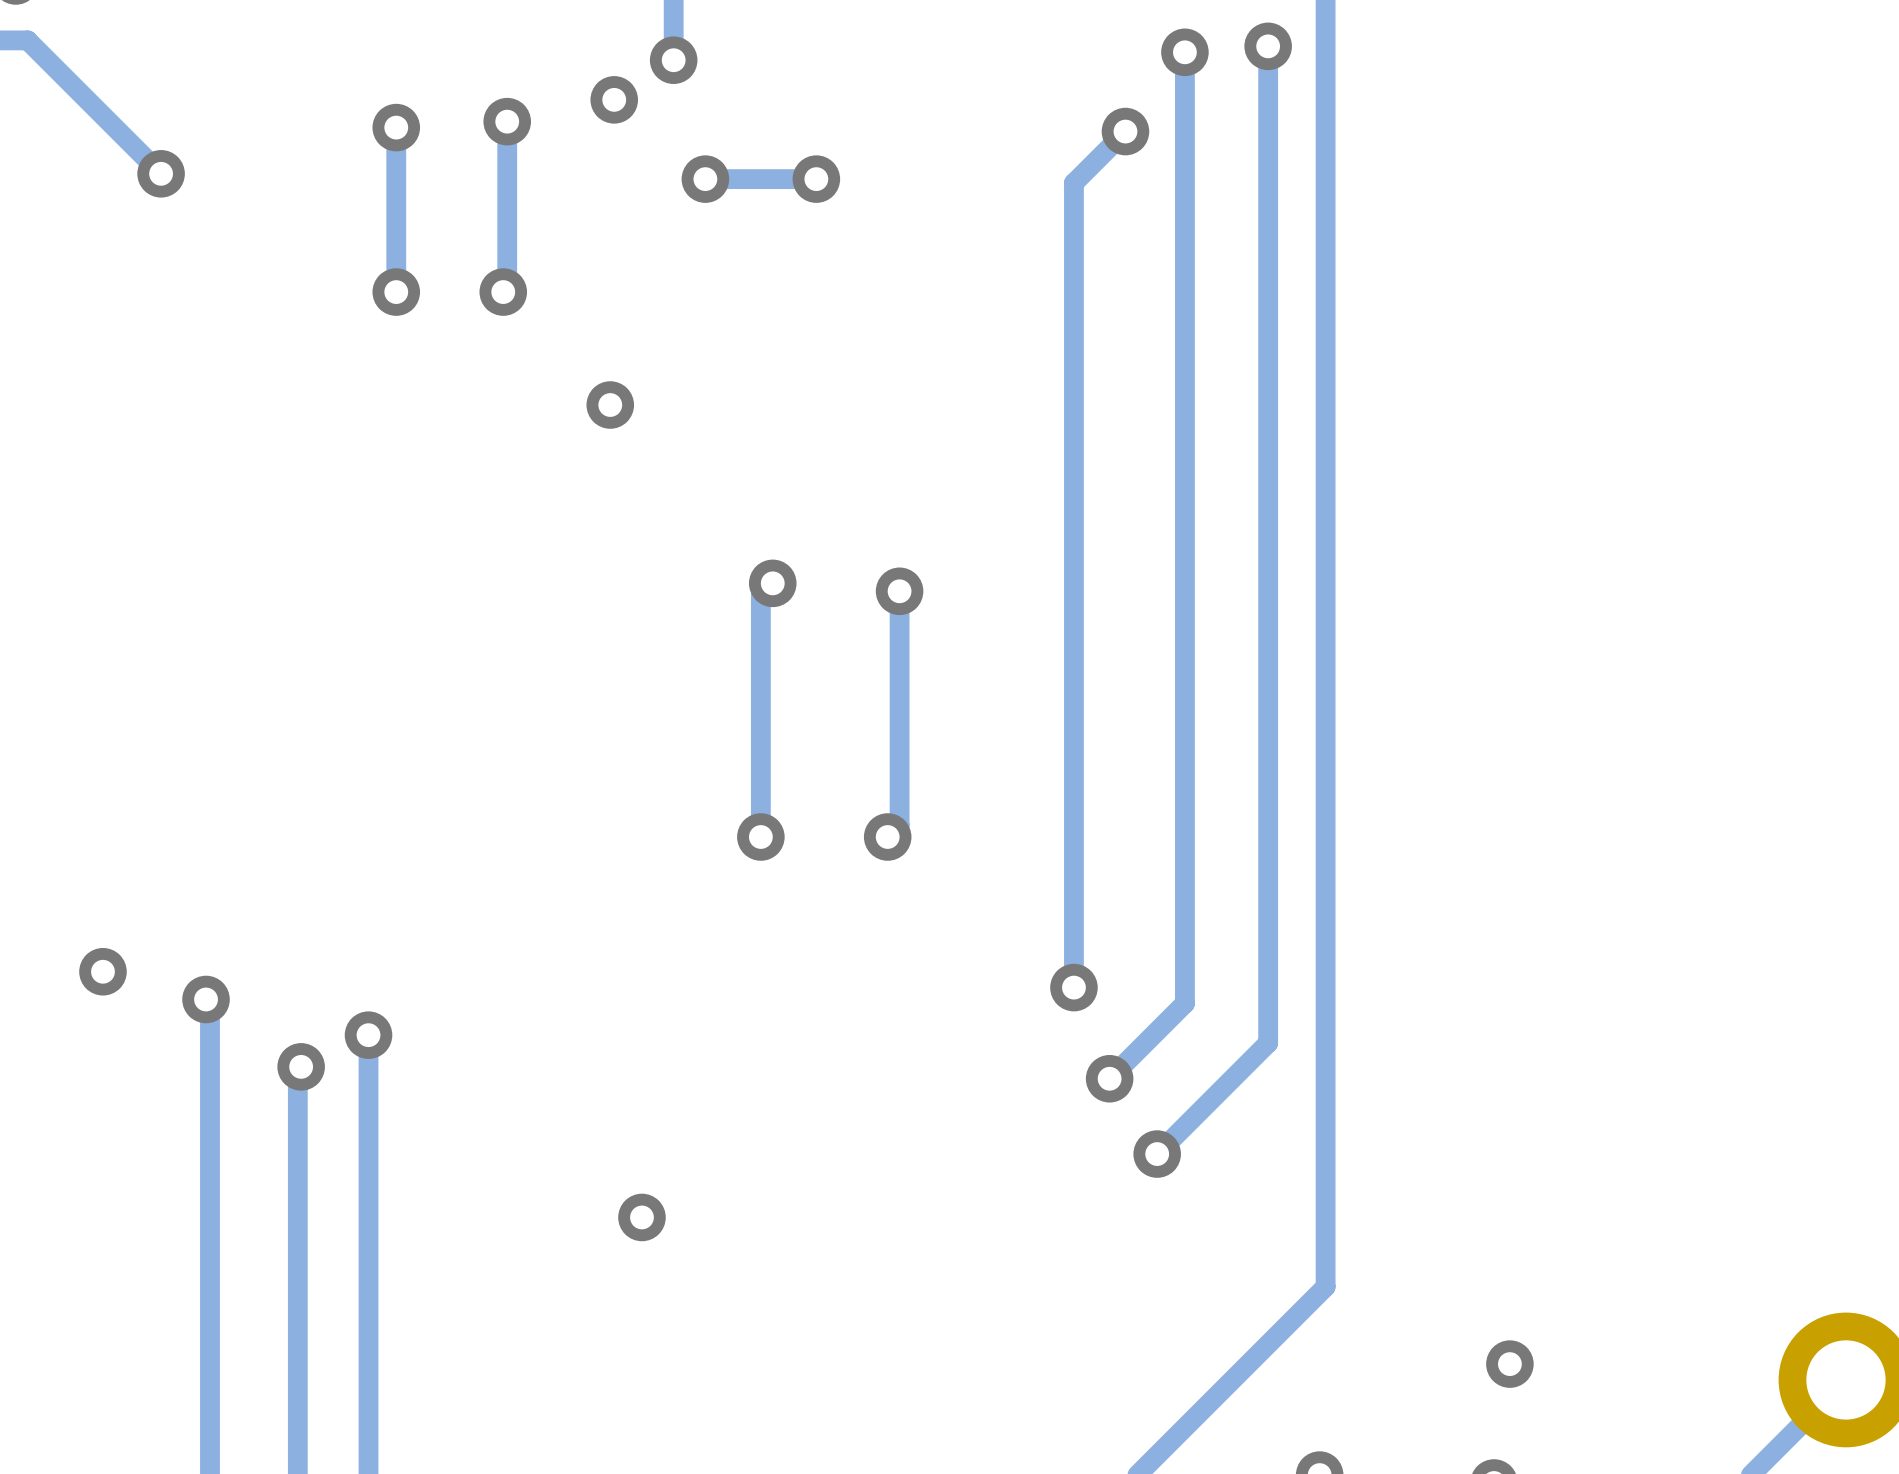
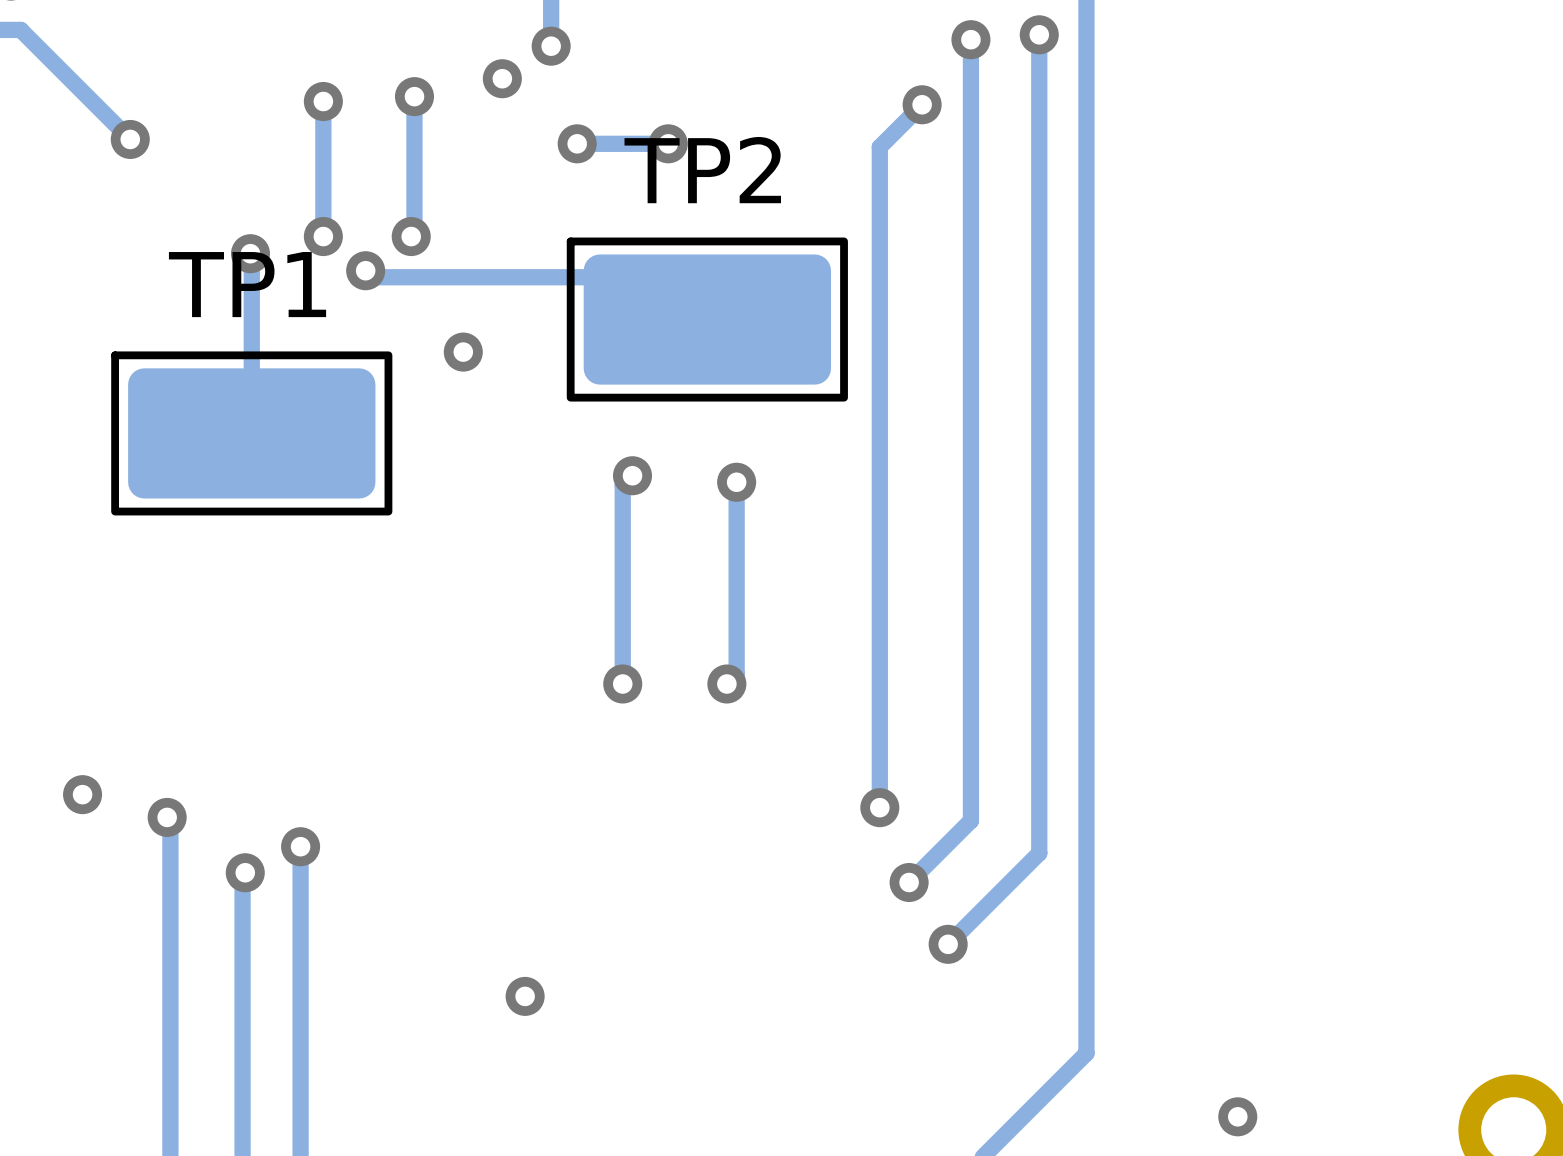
track: none -> (250, 253) (251, 433)
via: none -> (250, 253)
track: none -> (365, 270) (372, 277) (665, 277) (707, 319)
via: none -> (365, 270)
TP2: none -> (707, 319)
via position: (610, 405) -> (463, 352)
TP1: none -> (251, 433)

